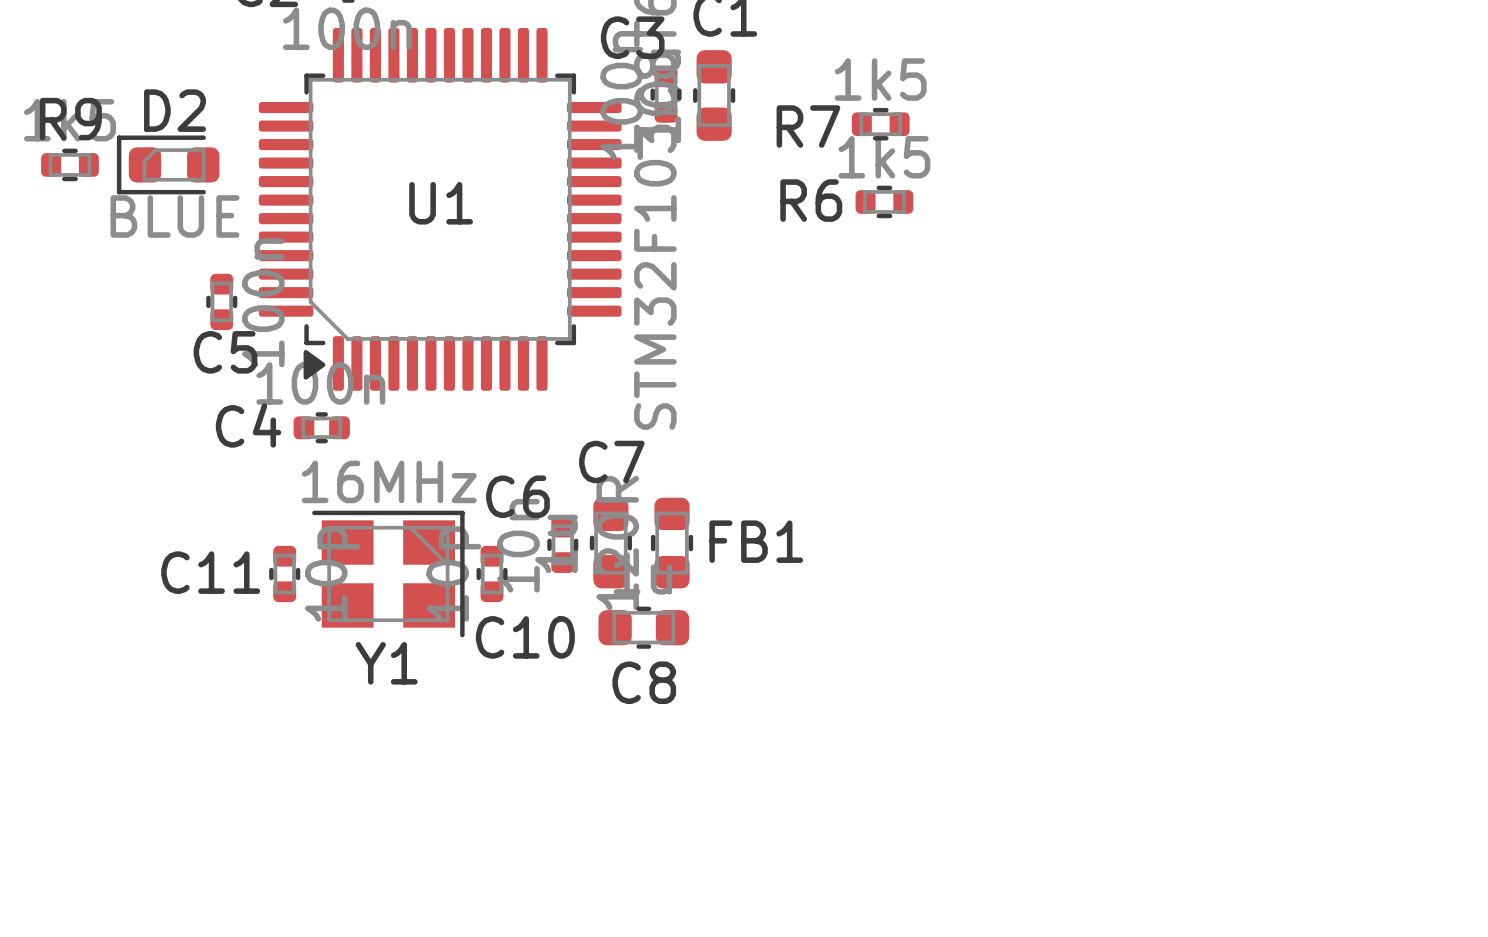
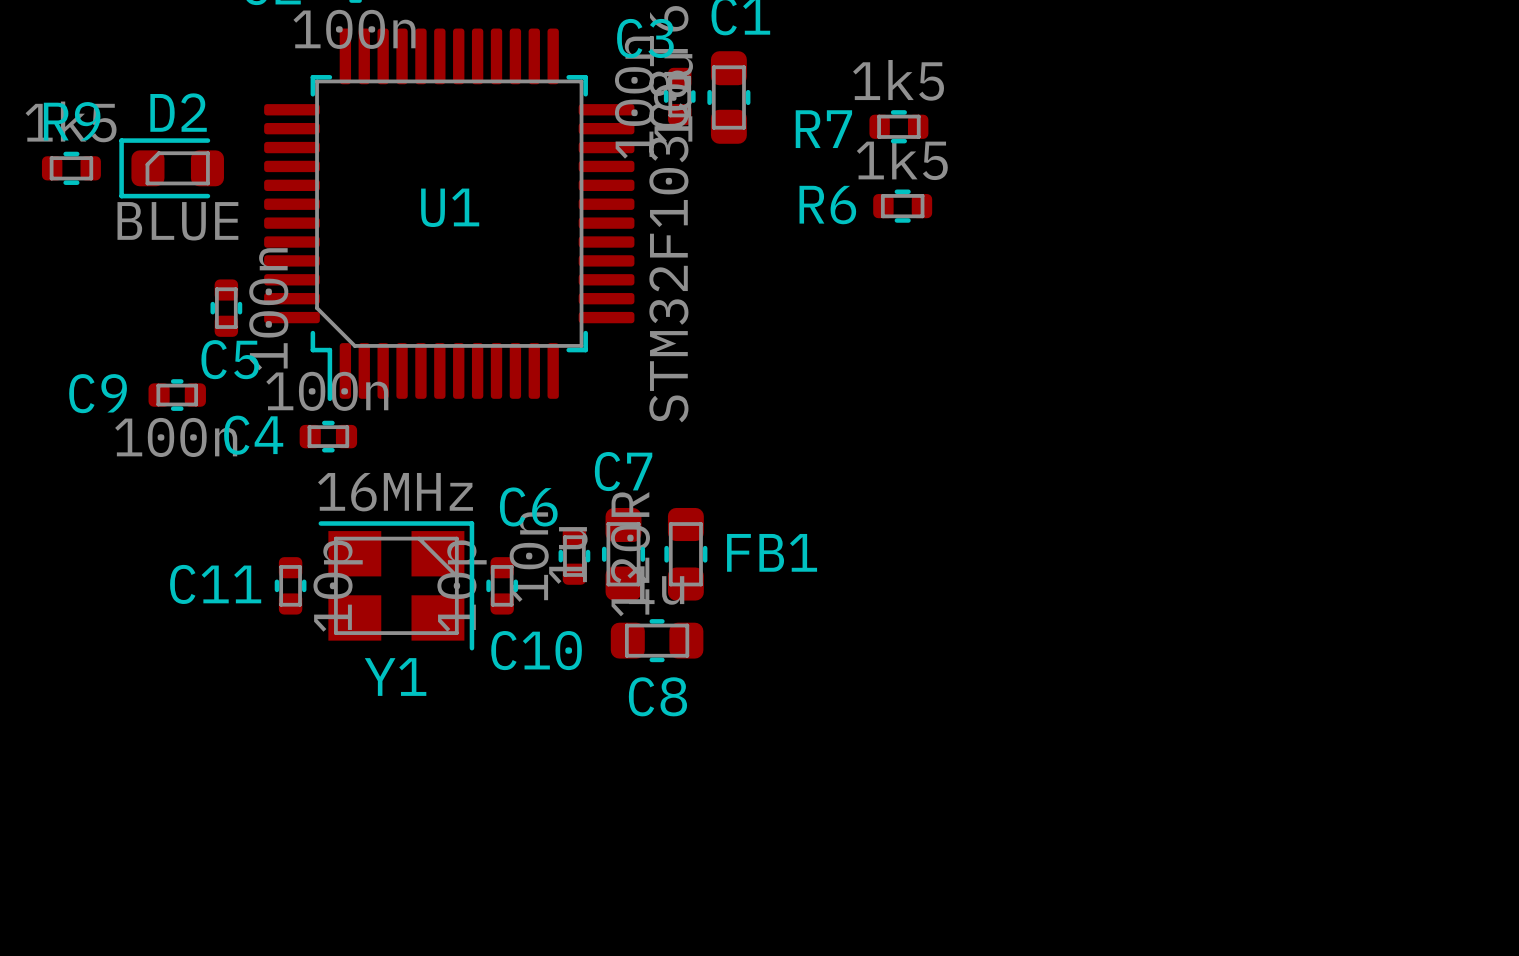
U1 footprint: [258, 27, 622, 391] -> [264, 28, 635, 402]
C9: none -> 100n (177, 395)

